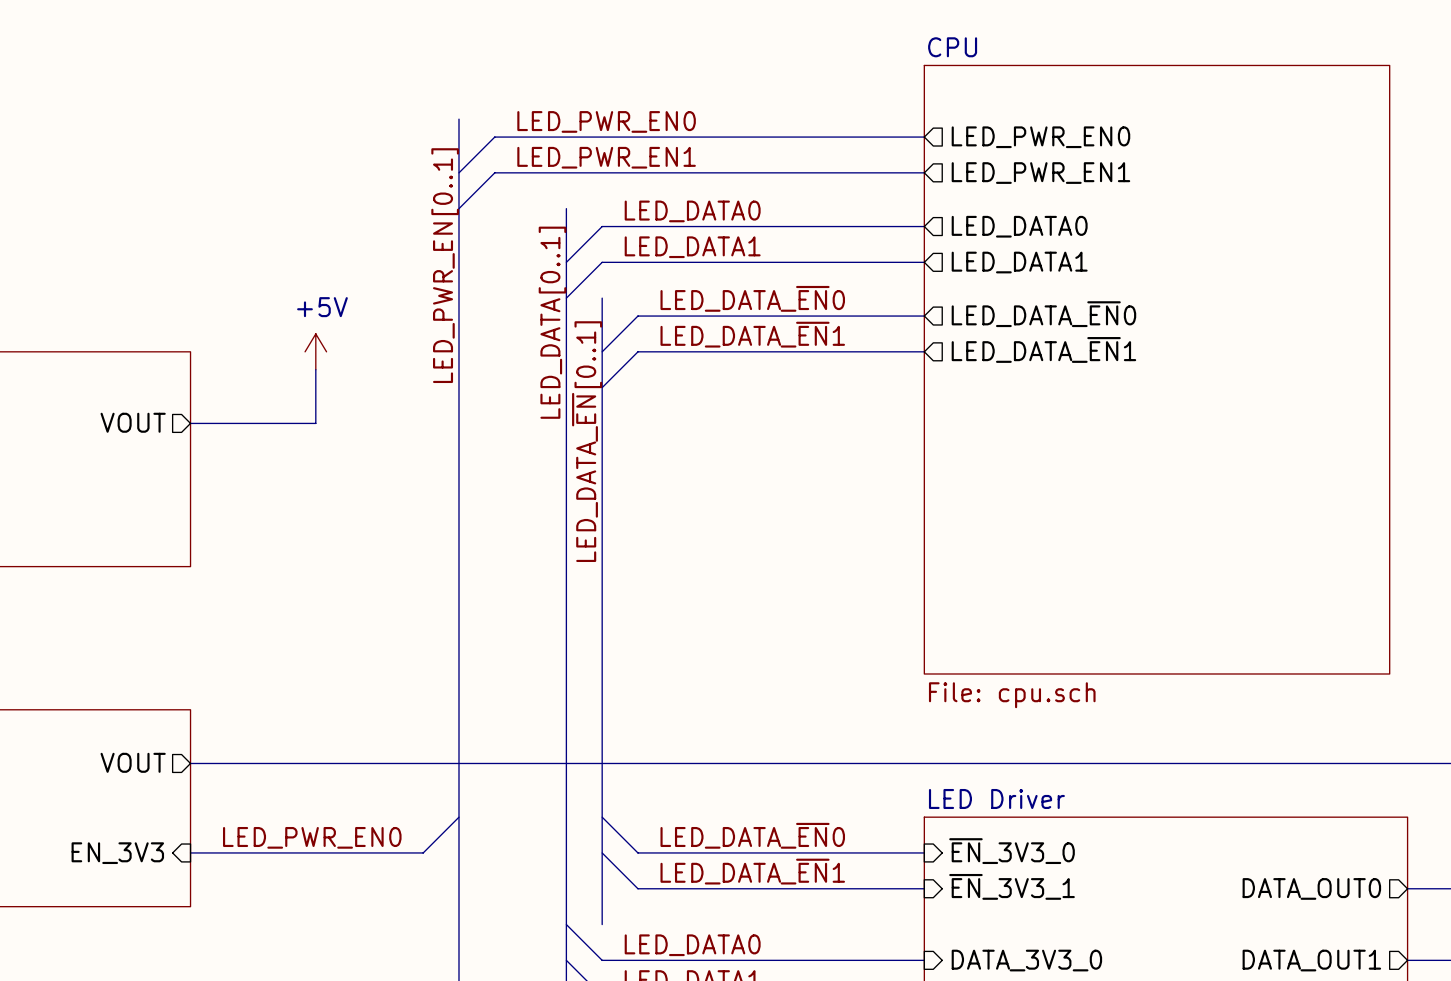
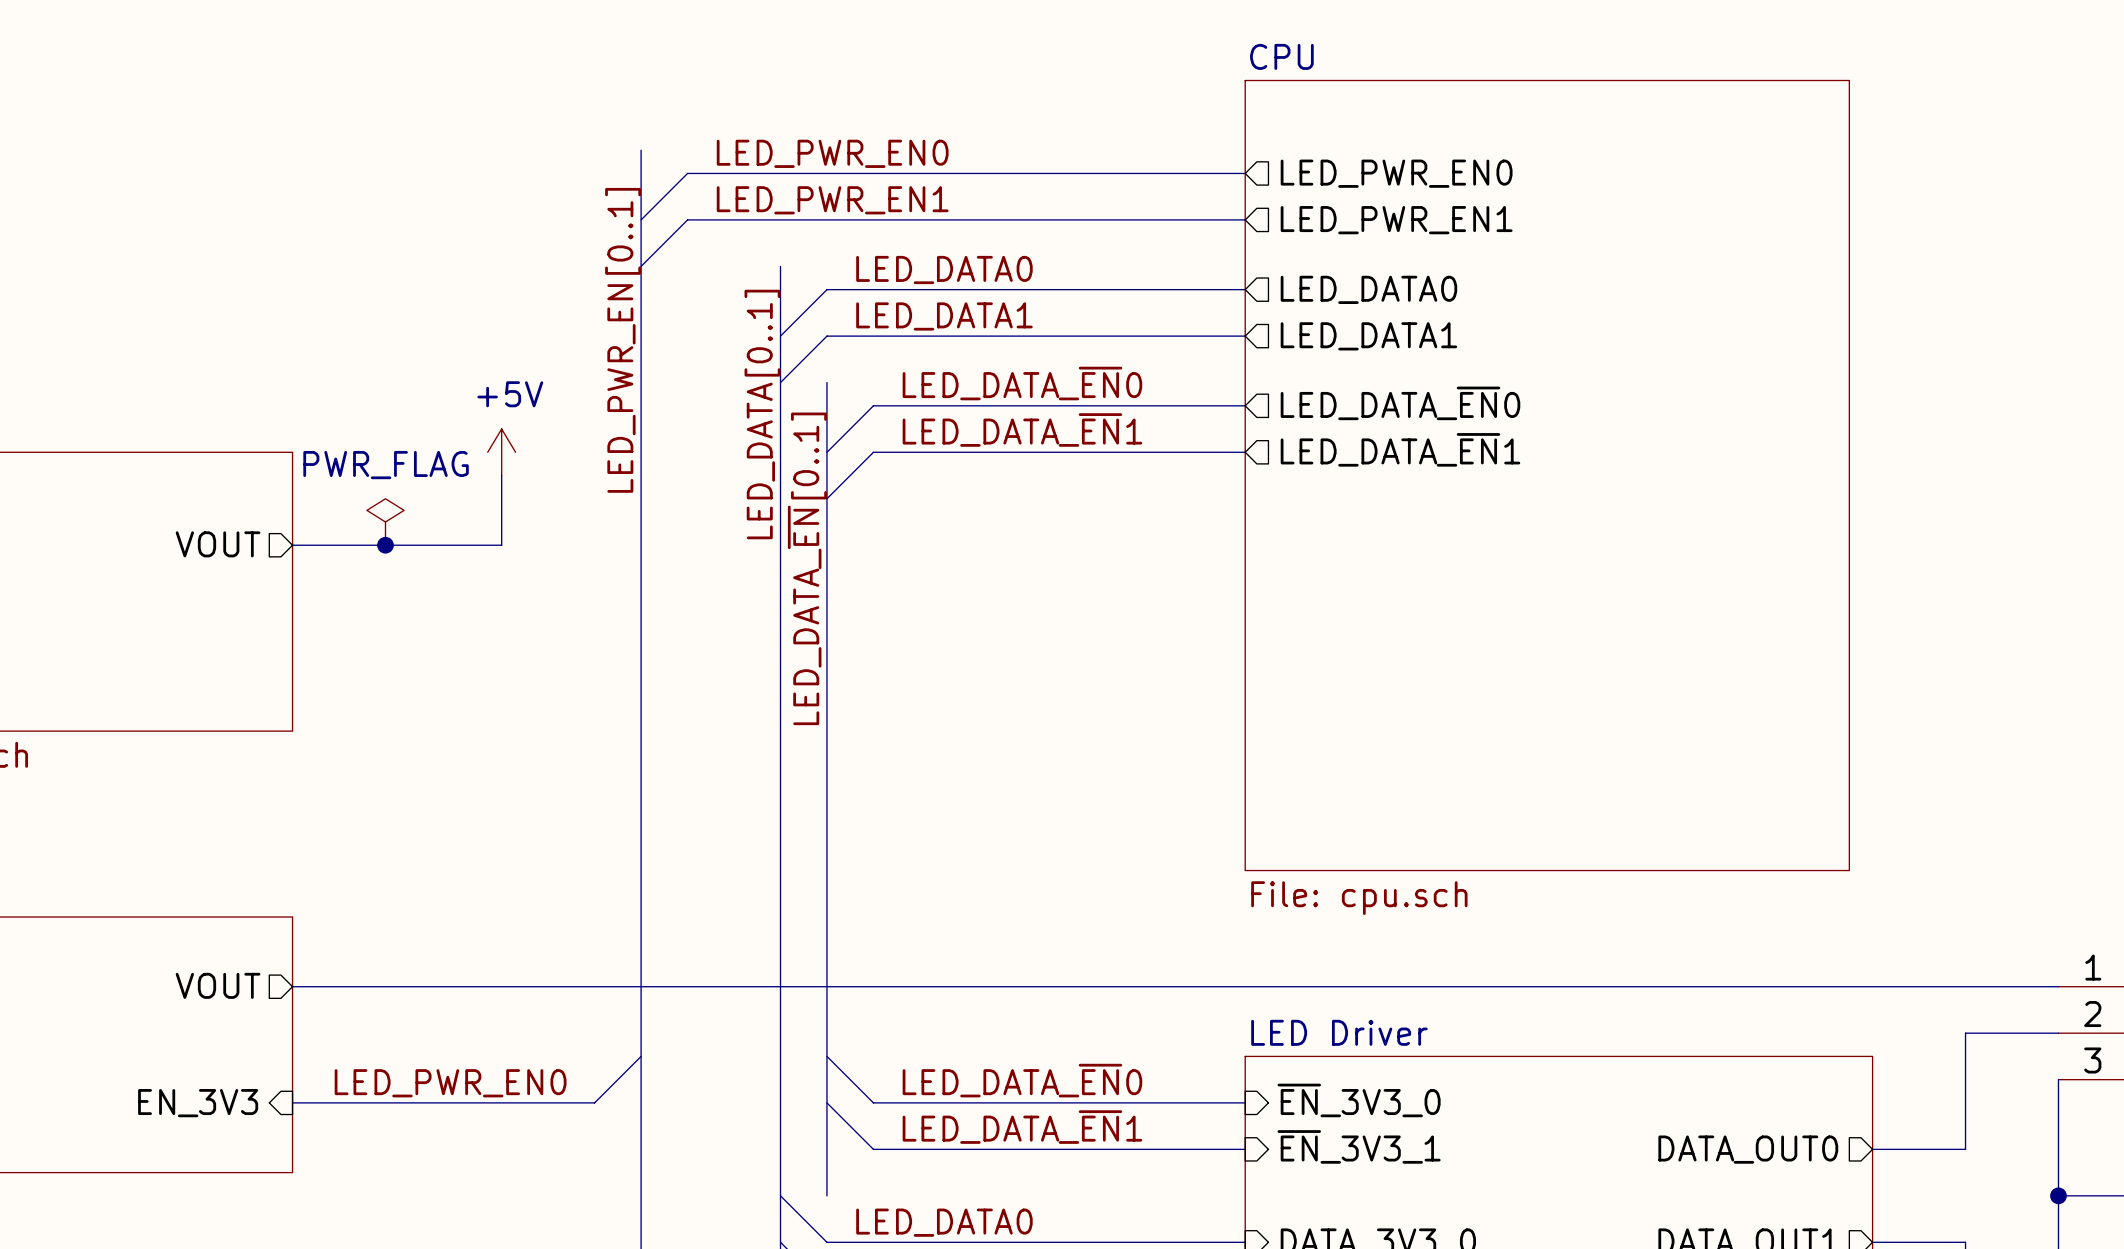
power symbol position: +5V (315, 351) -> +5V (501, 452)
wire: (315, 369) (315, 423) -> (501, 475) (501, 545) (455, 545)
power symbol: none -> PWR_FLAG (385, 521)
junction: none -> (385, 545)

